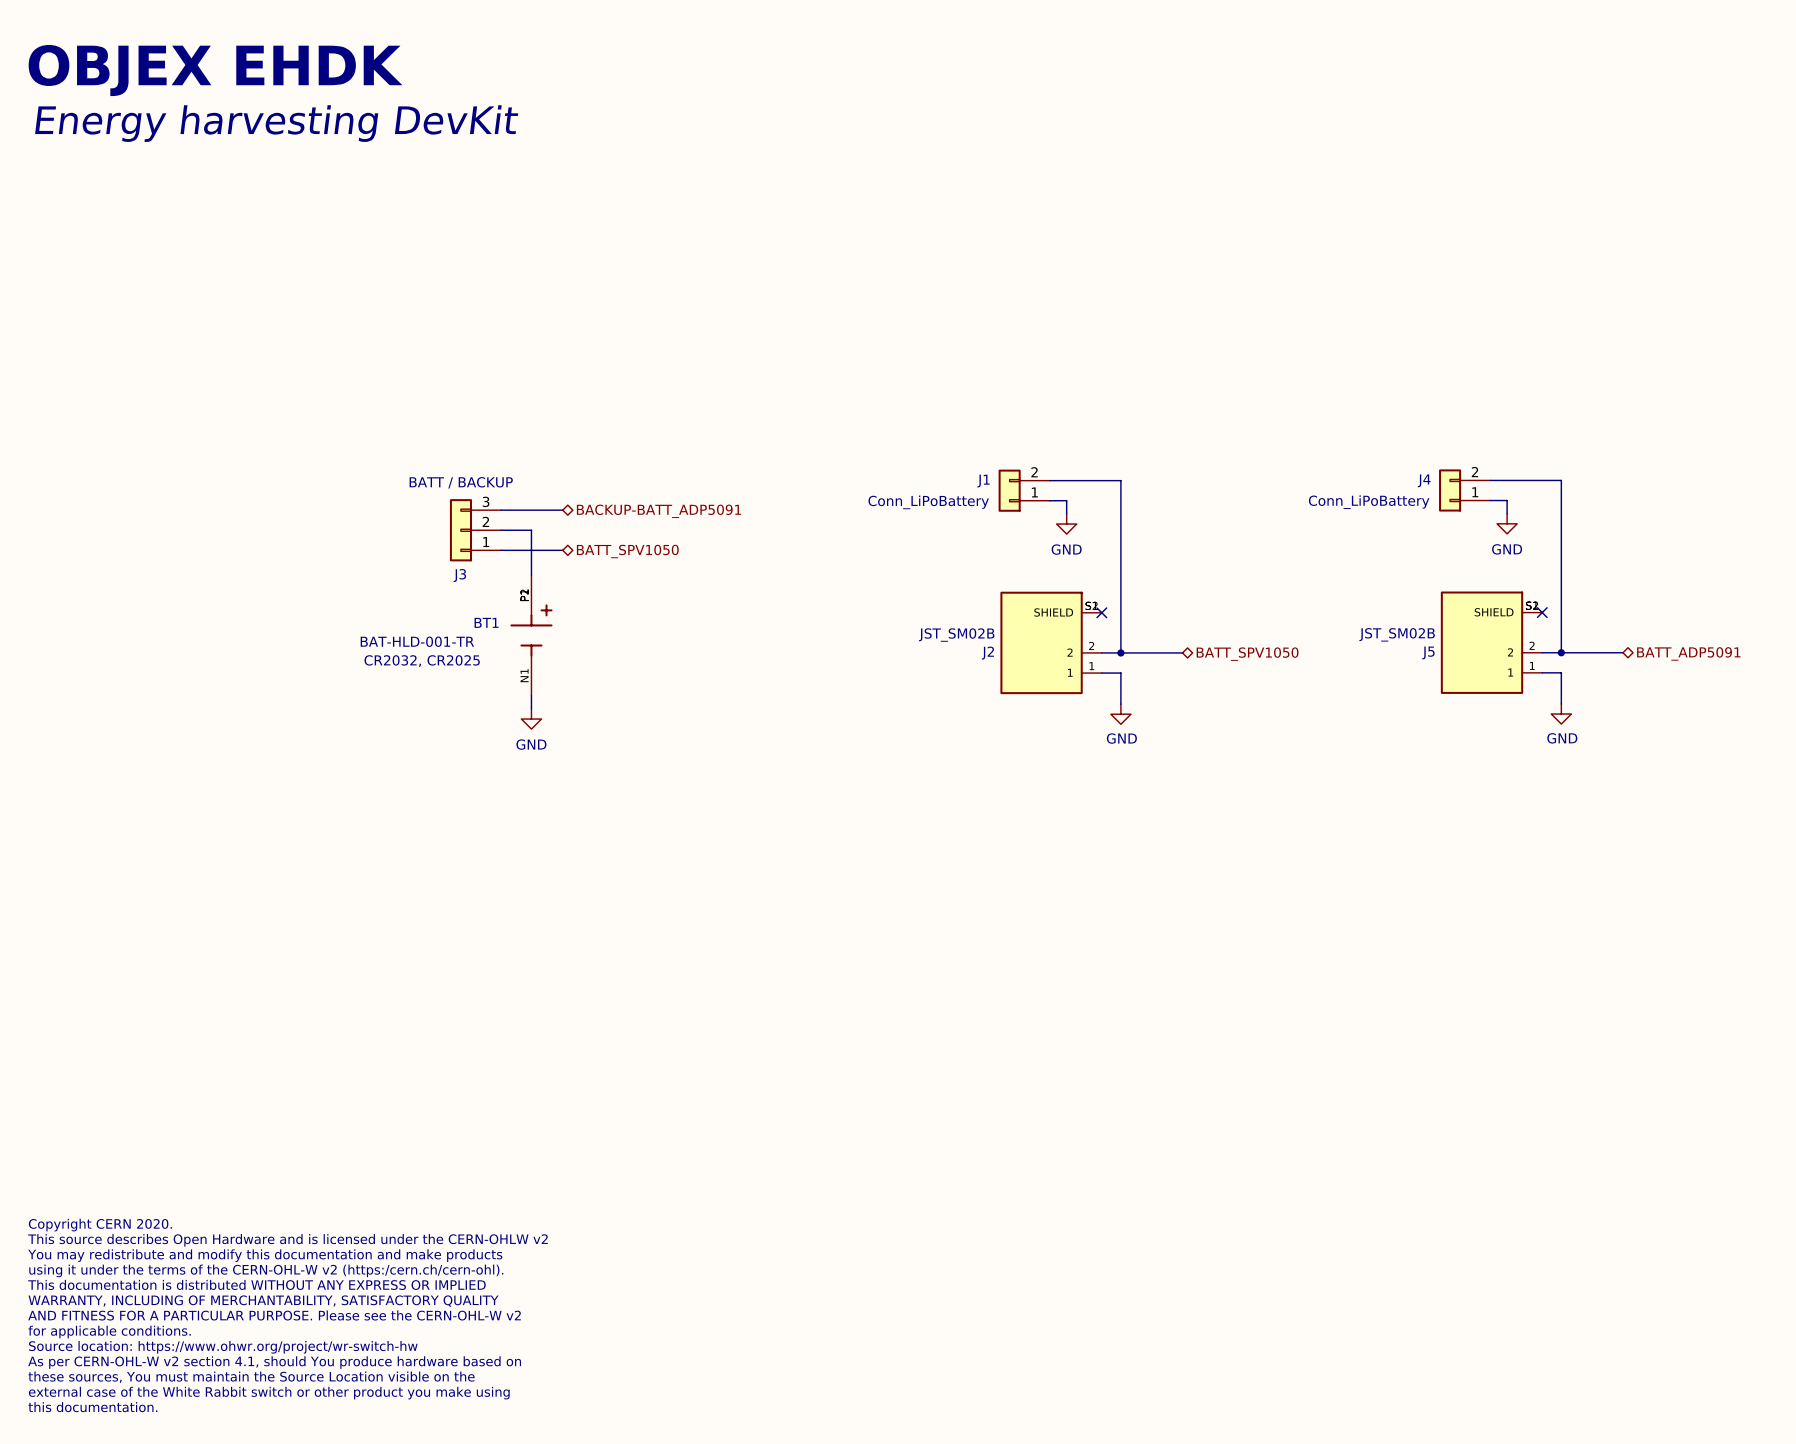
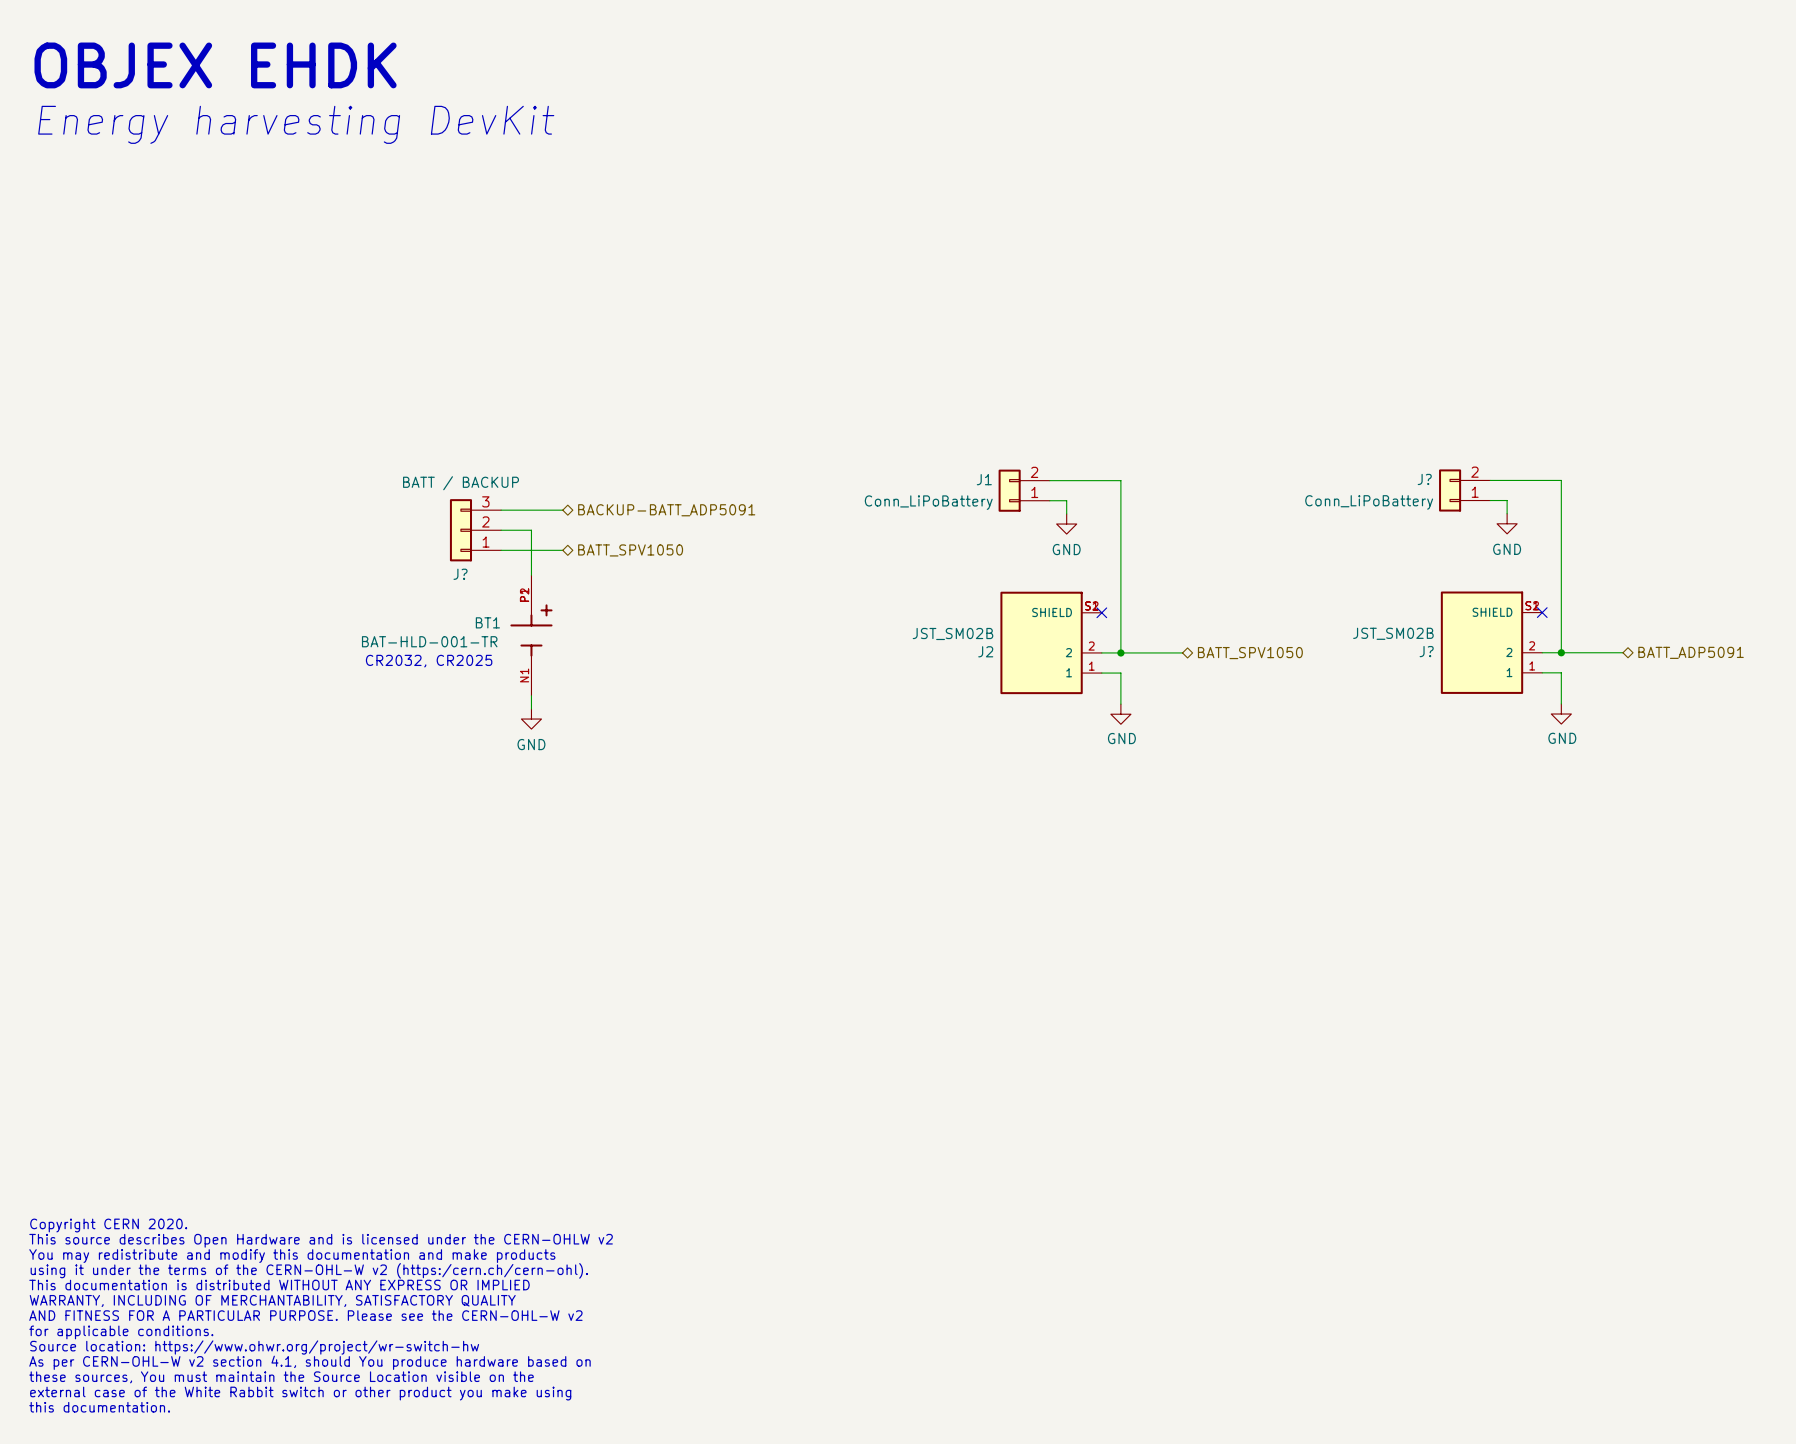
J4 name: J4 (1424, 480) -> J? (1424, 479)
J3 name: J3 (459, 575) -> J? (460, 574)
J5 name: J5 (1428, 652) -> J? (1426, 651)

